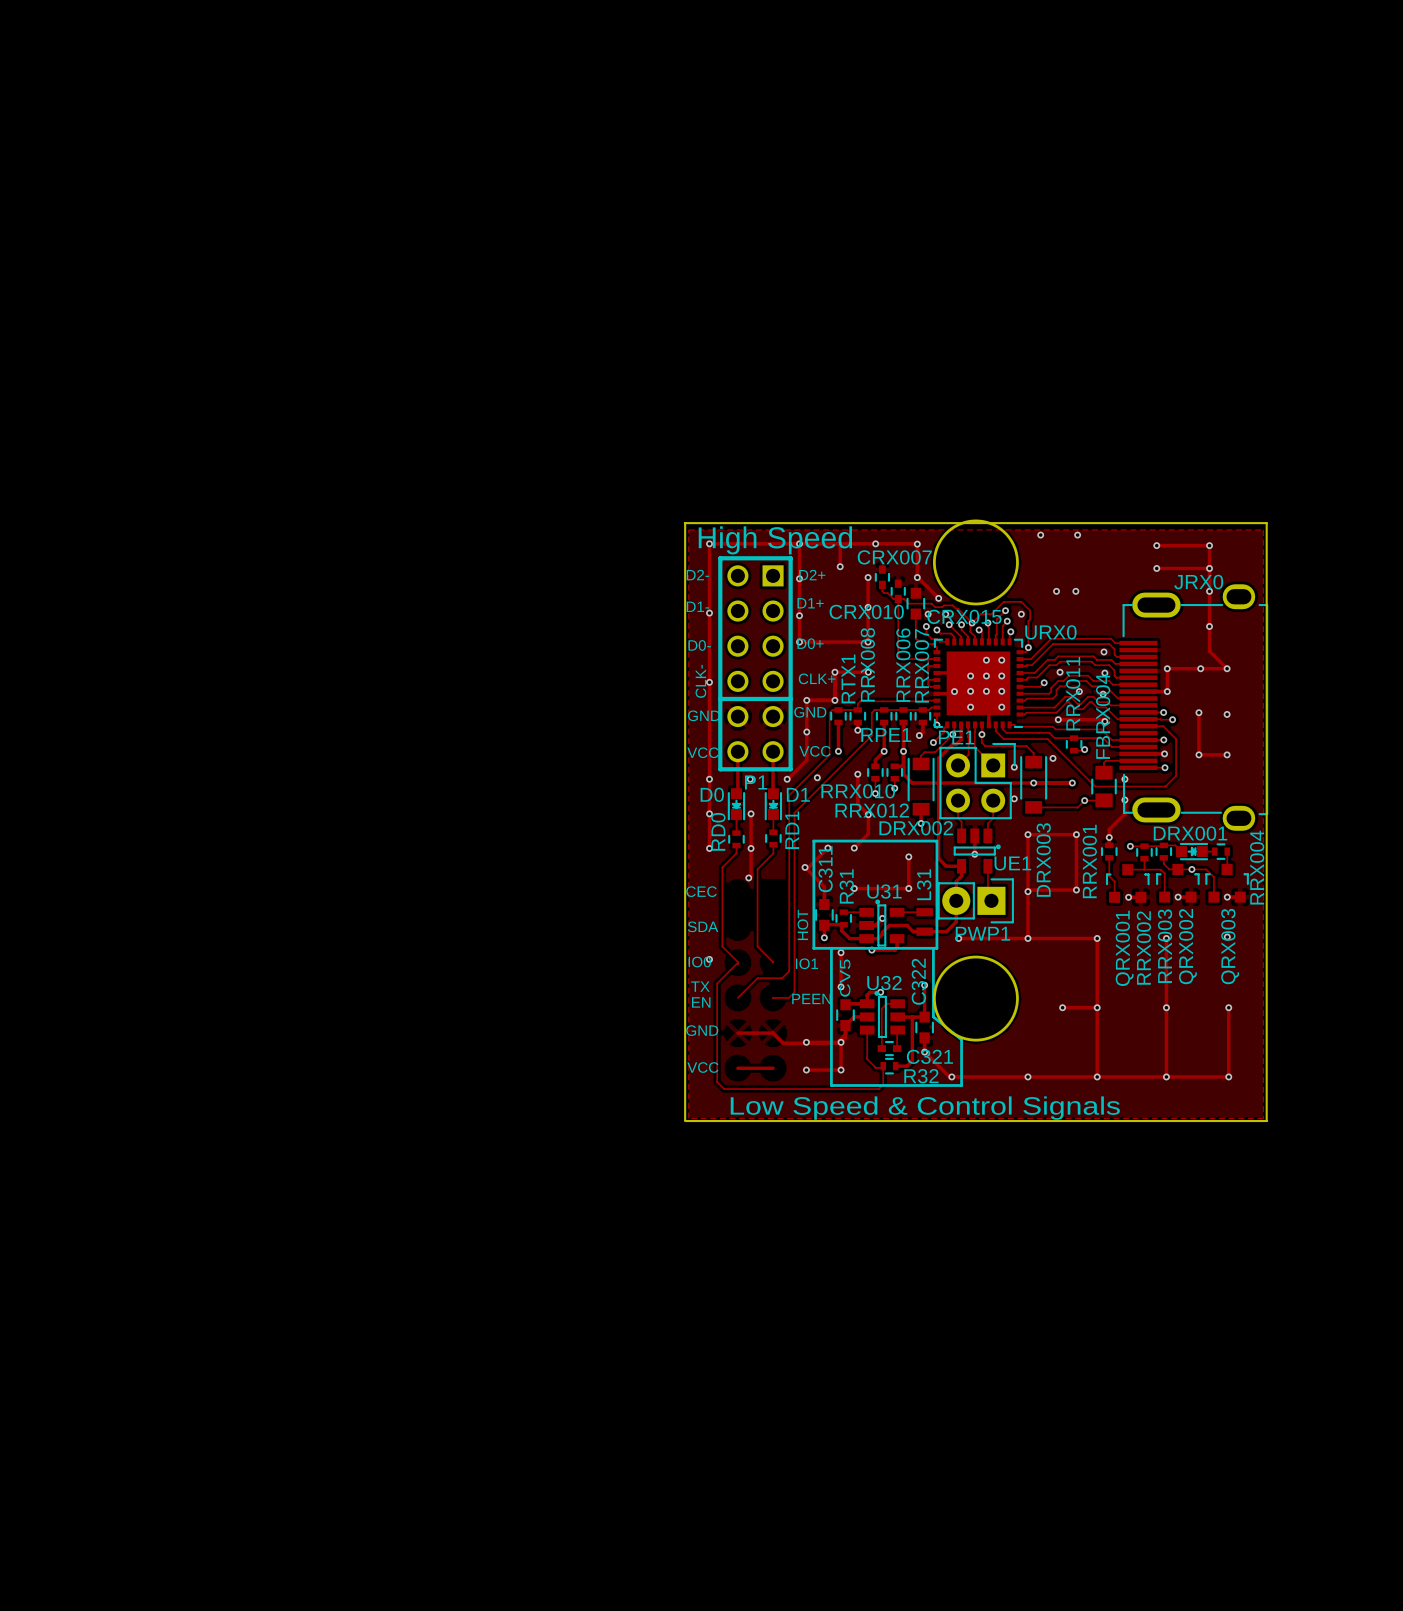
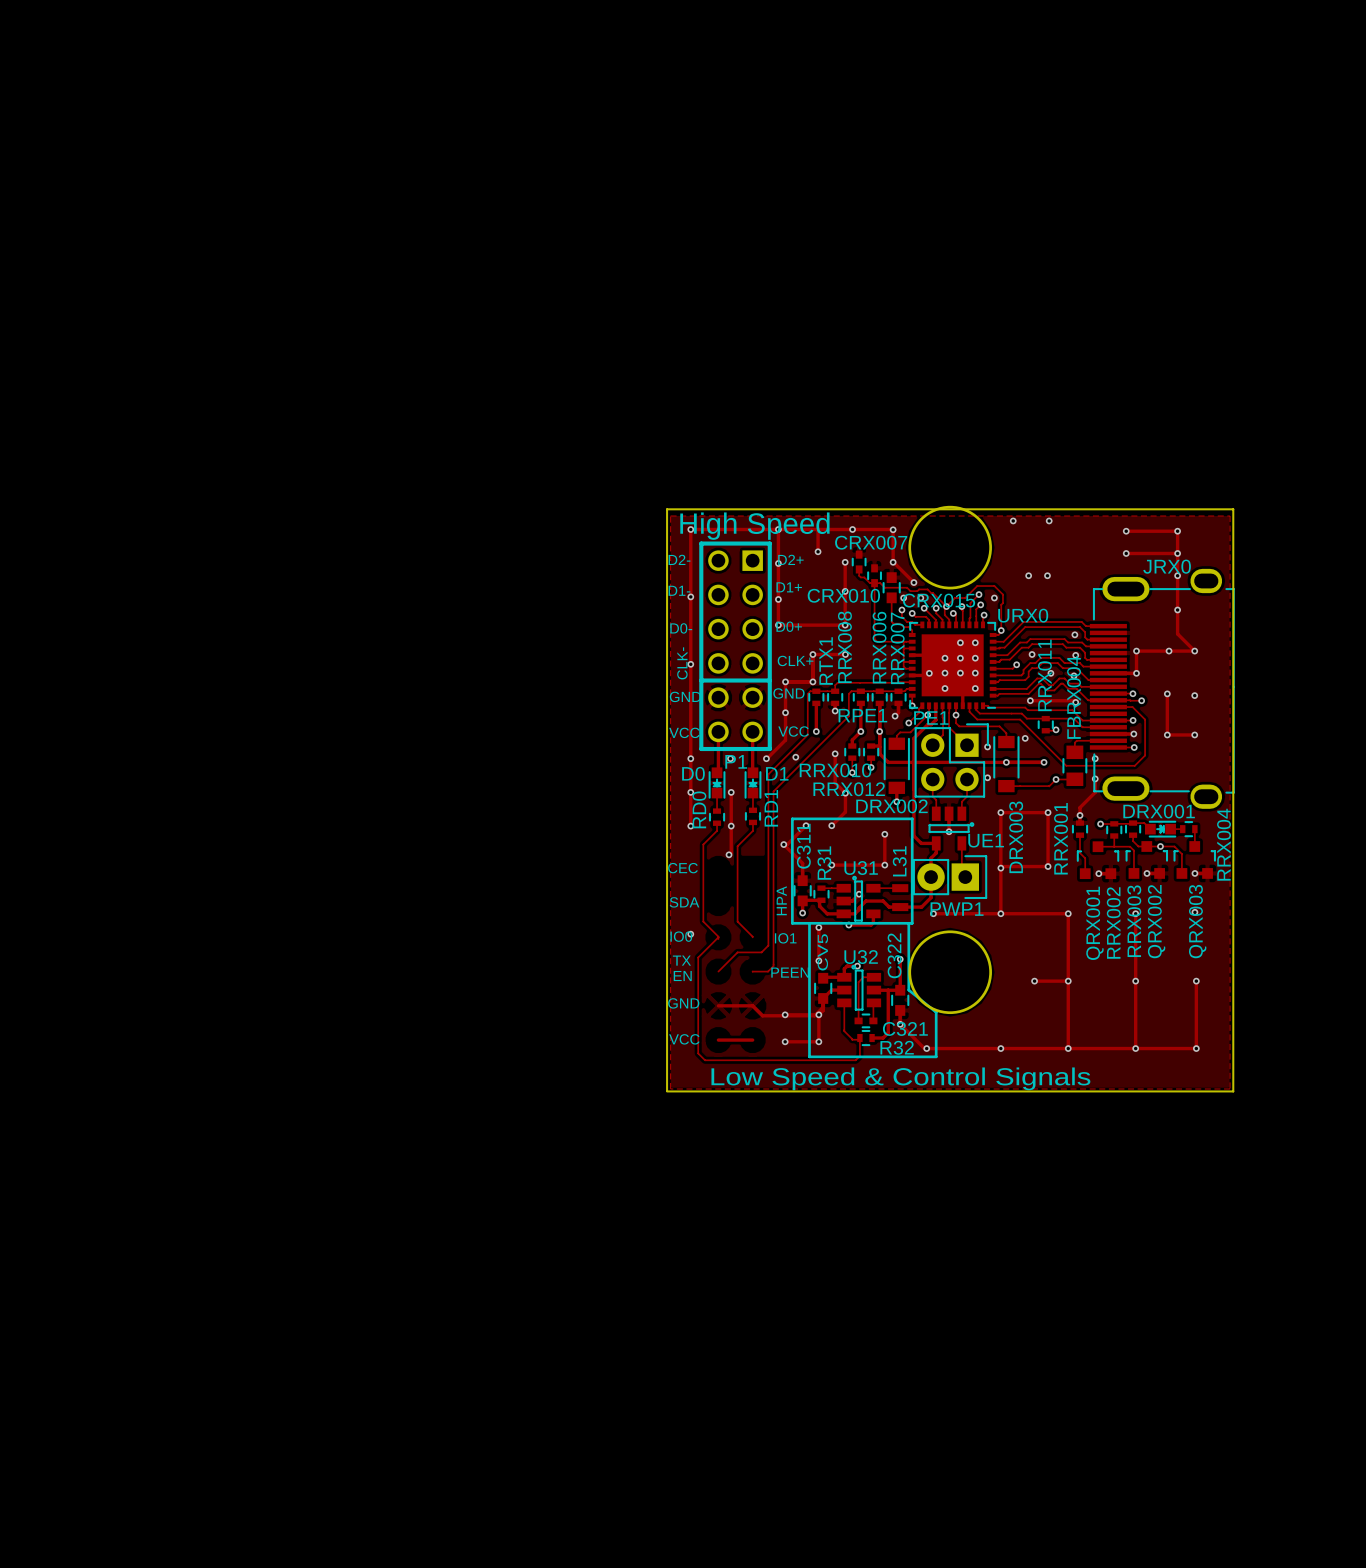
text: HOT (802, 924) -> HPA (781, 900)

